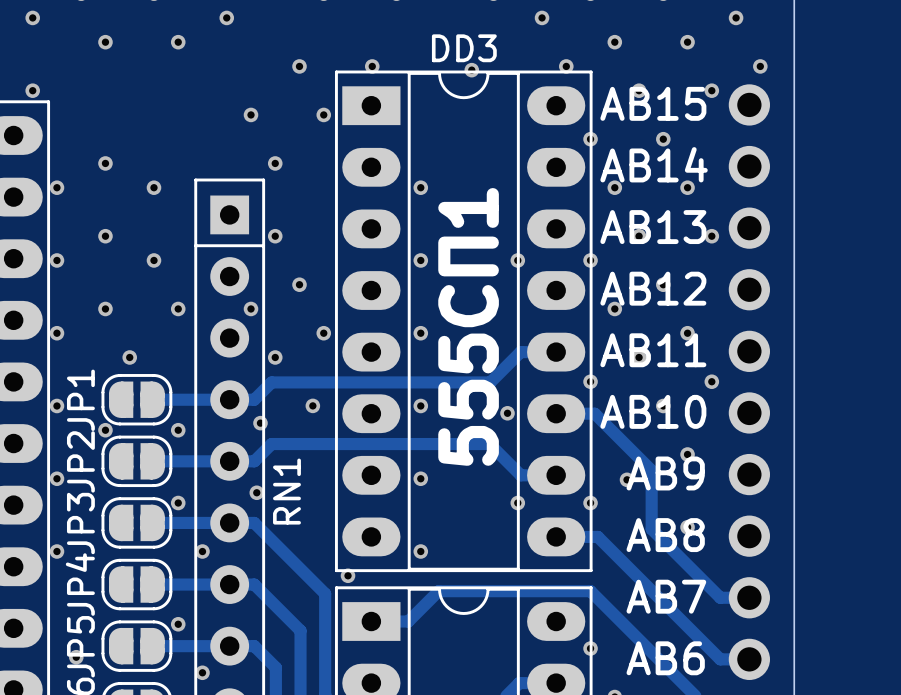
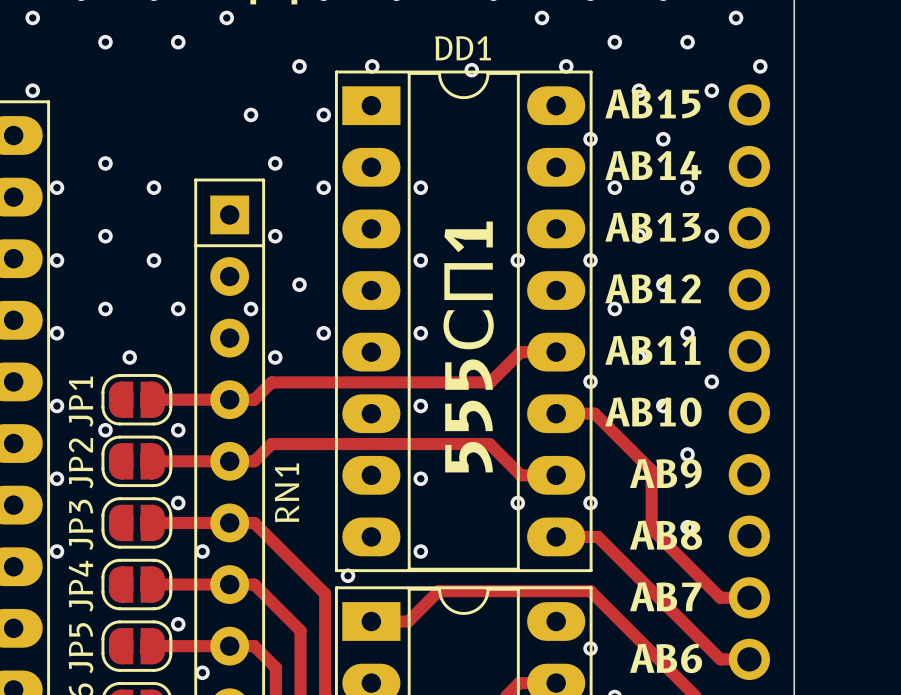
DD3 name: DD3 (464, 48) -> DD1 (463, 48)
via: none -> (323, 187)
via: (312, 405) -> none
via: (507, 413) -> none
via: (260, 423) -> none
via: (627, 479) -> none
via: (256, 492) -> none
via: (76, 657) -> none

